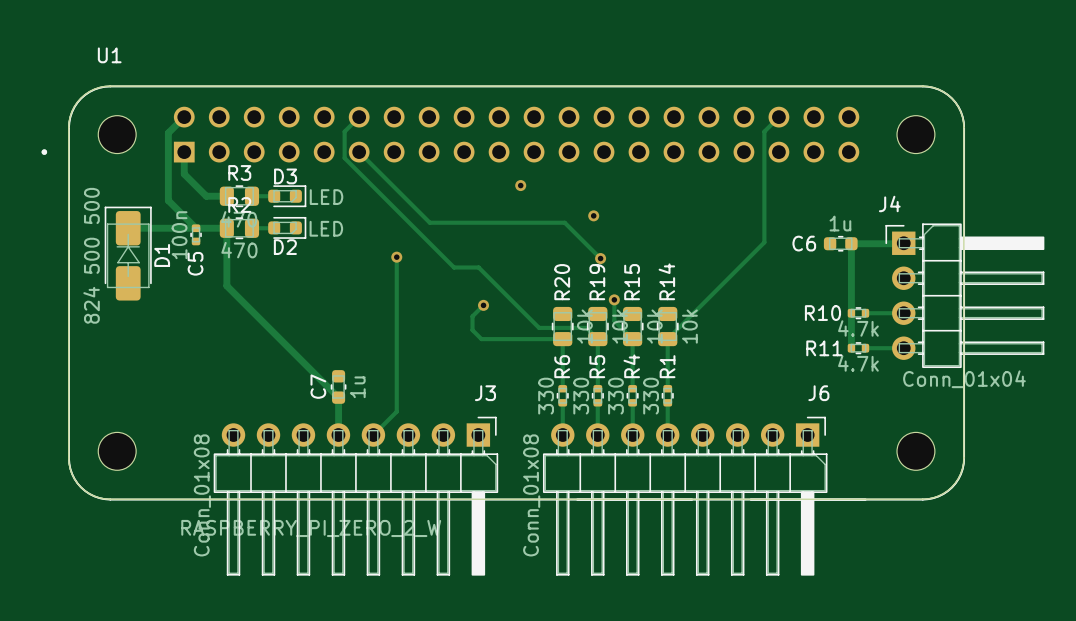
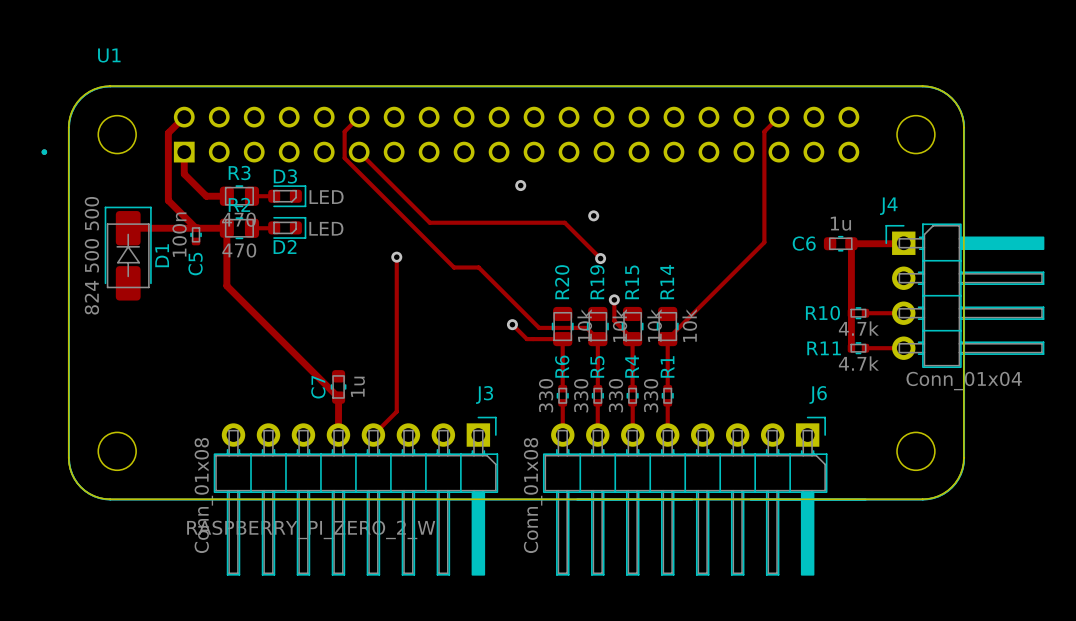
track: (483, 305) (472, 316) (472, 330) (481, 339) (526, 339) -> (512, 324) (526, 339)
via position: (483, 305) -> (512, 324)

